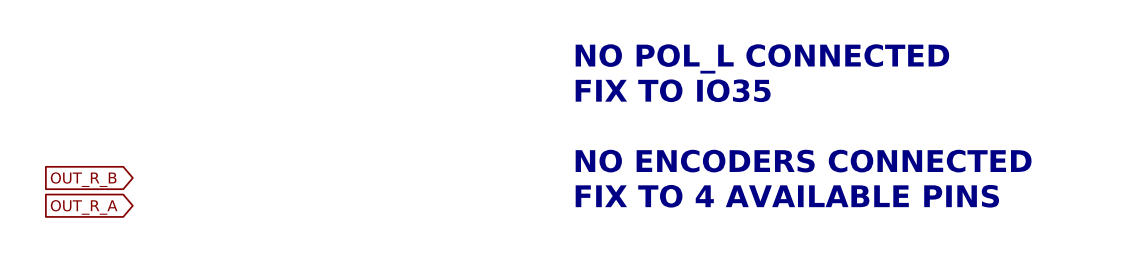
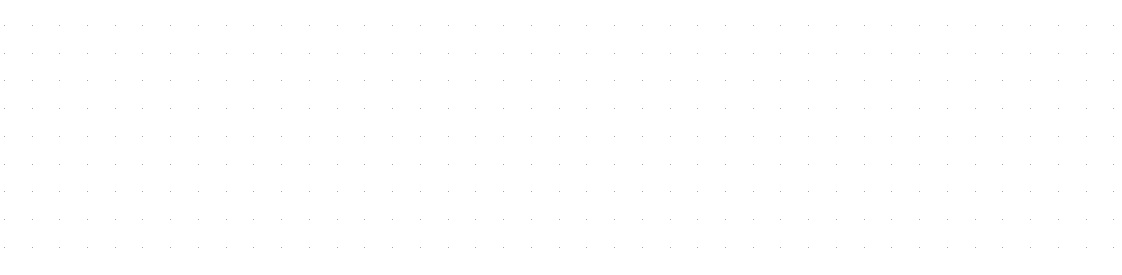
text: NO POL_L CONNECTED (762, 58) -> none
text: FIX TO IO35 (673, 90) -> none
text: NO ENCODERS CONNECTED (803, 161) -> none
global label: OUT_R_B (83, 179) -> none
text: FIX TO 4 AVAILABLE PINS (787, 196) -> none
global label: OUT_R_A (84, 207) -> none

